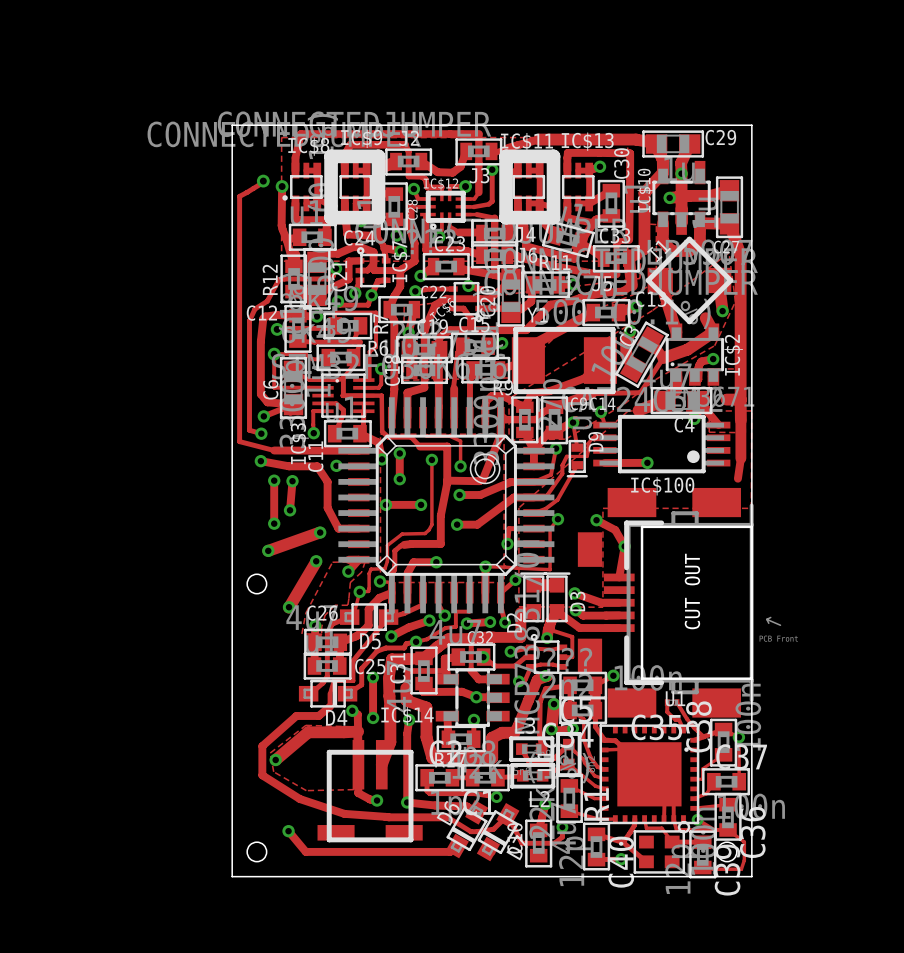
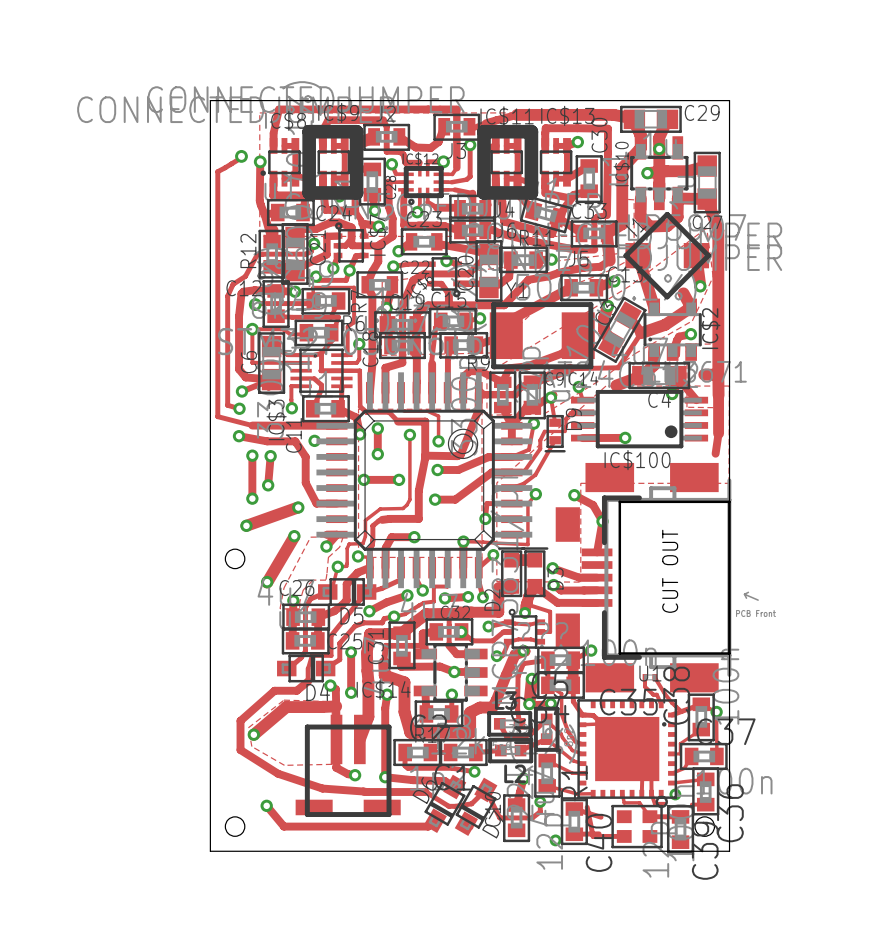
track: (634, 819) (634, 825) (623, 842) (646, 861) -> (587, 807) (593, 836) (624, 836)
track: (673, 819) (676, 829) (714, 829) (697, 819) -> (651, 793) (654, 803) (665, 803)
track: (728, 829) (744, 842) (744, 860) (741, 869) (702, 867) -> none
via: (621, 859) -> none
via: none -> (555, 840)

